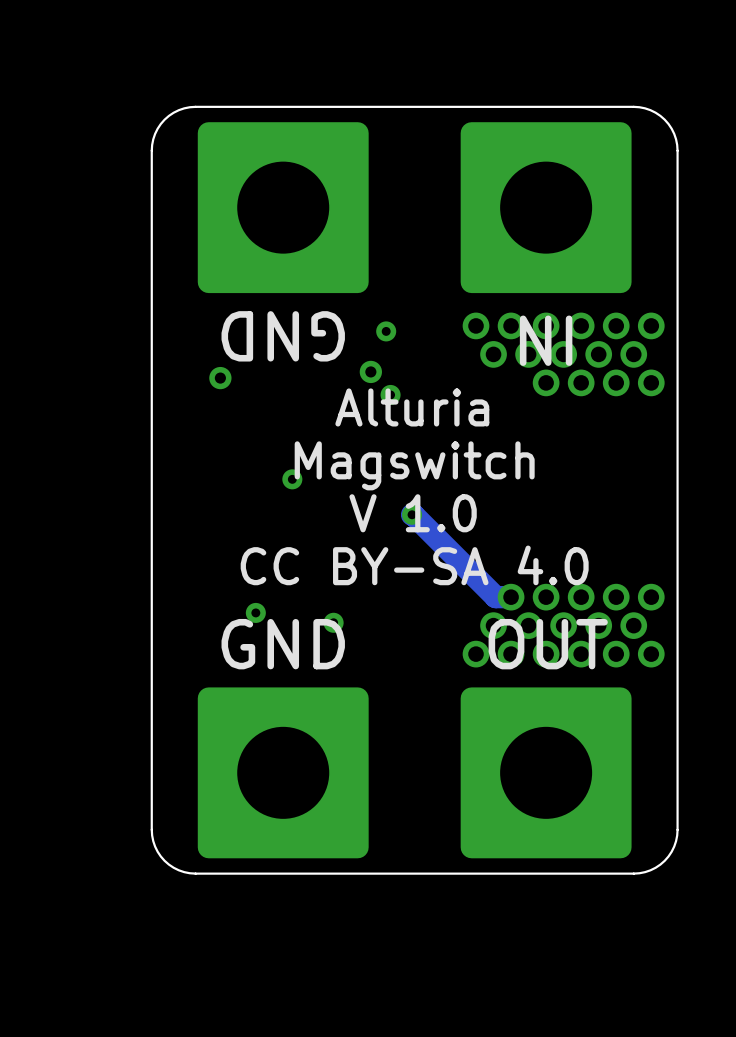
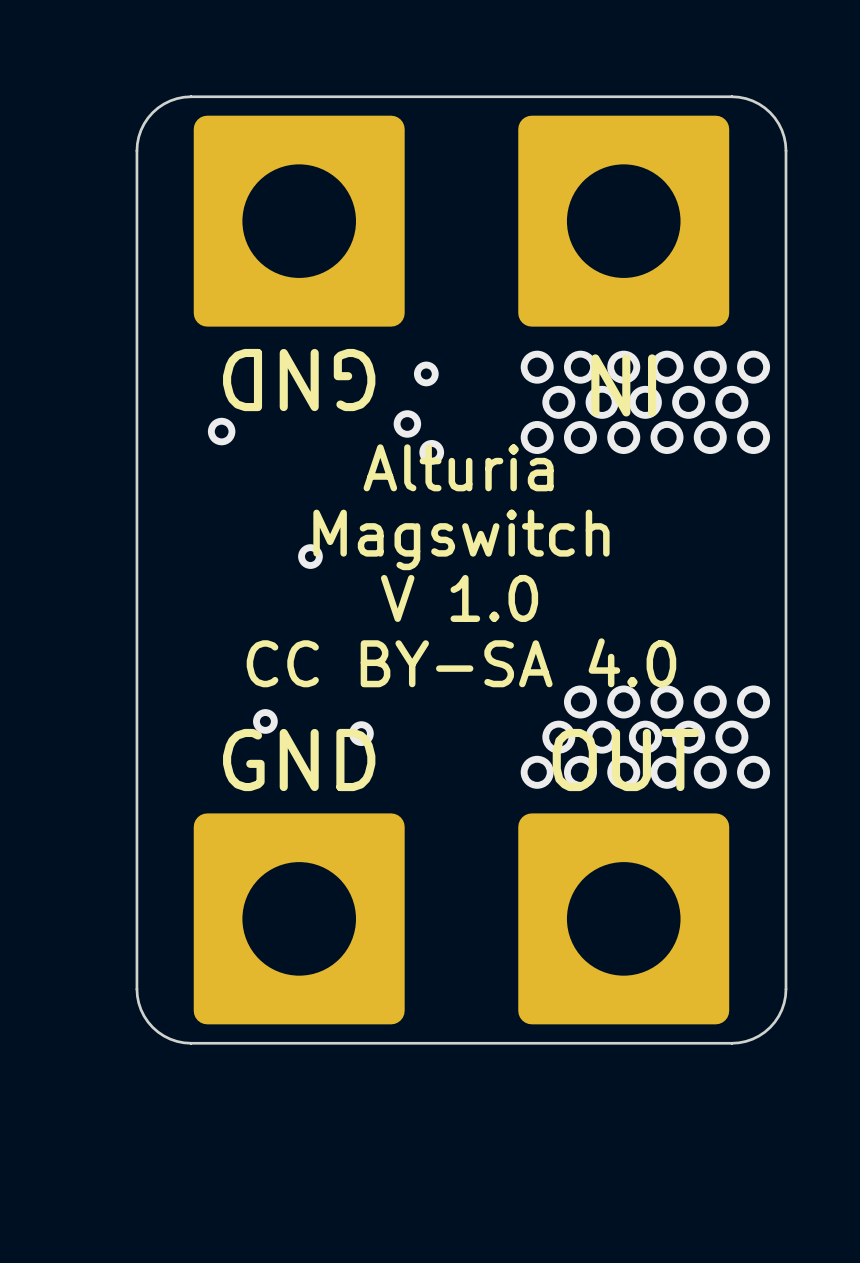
via: none -> (537, 437)
via: none -> (580, 437)
track: (412, 514) (495, 597) (511, 597) -> none
via: (412, 514) -> none

